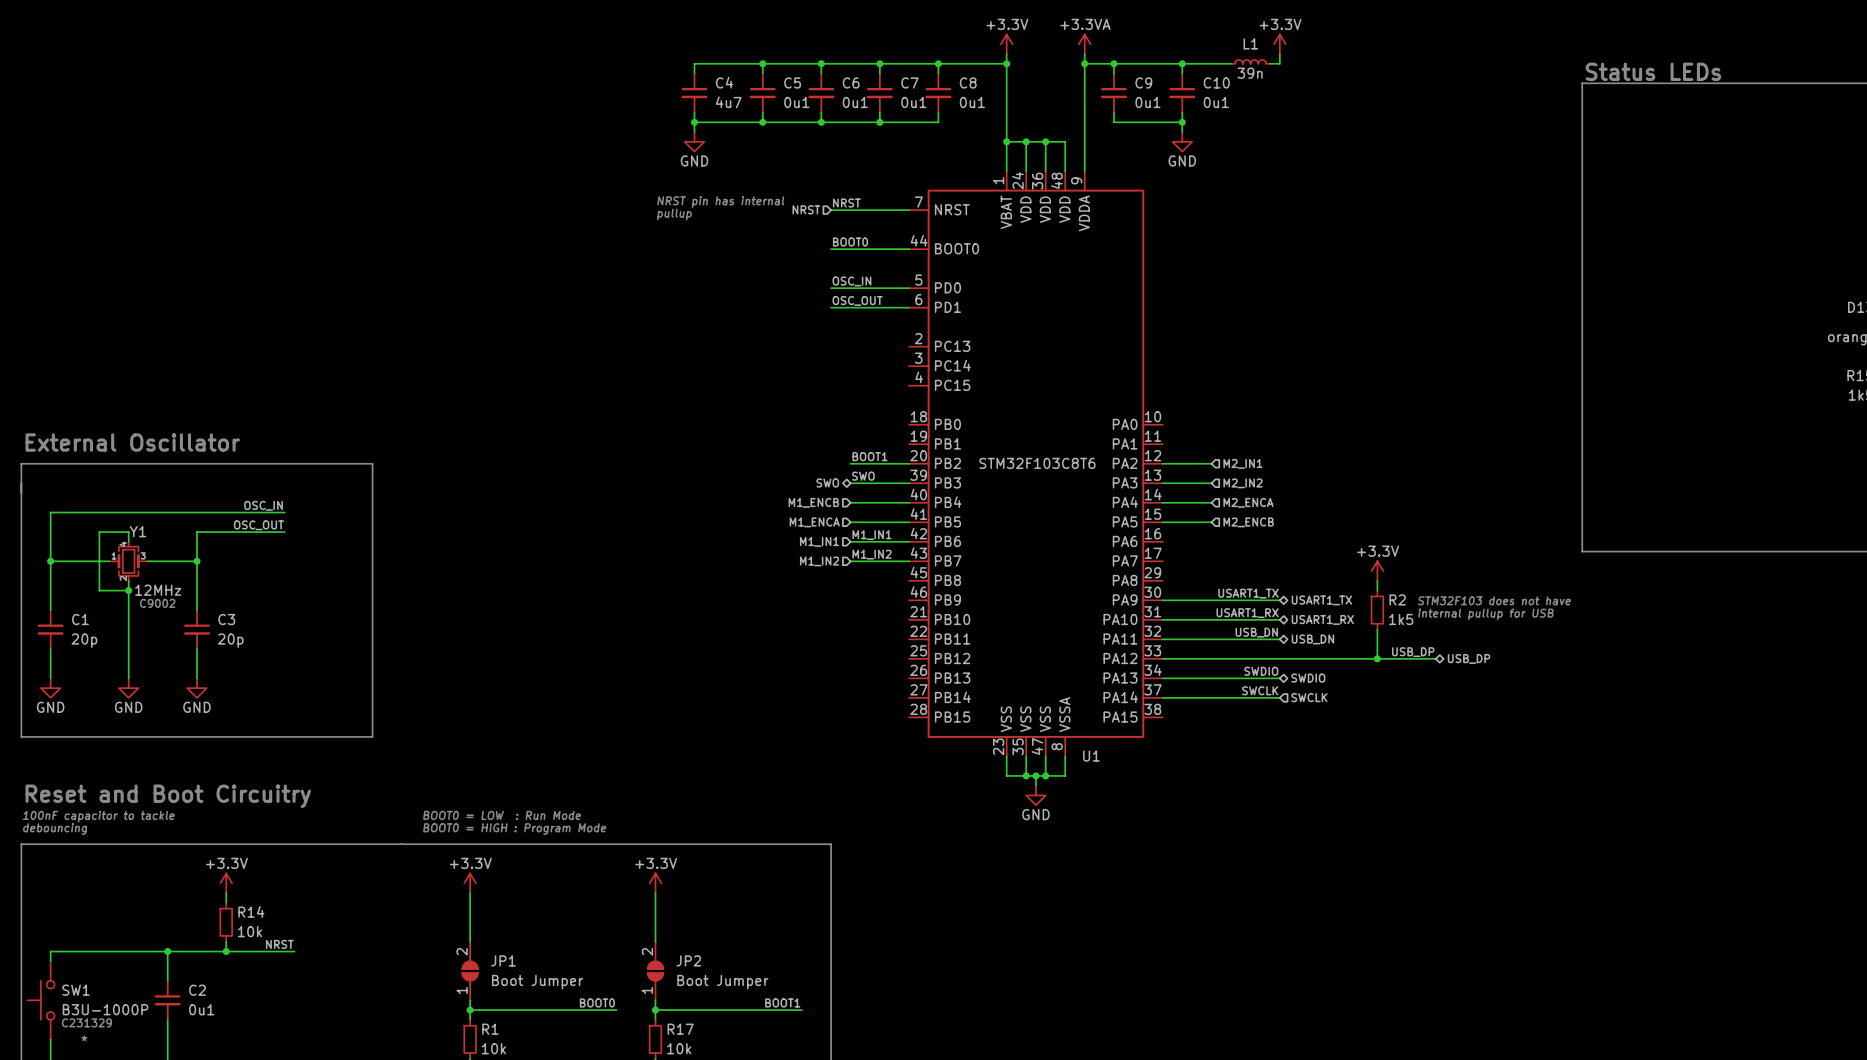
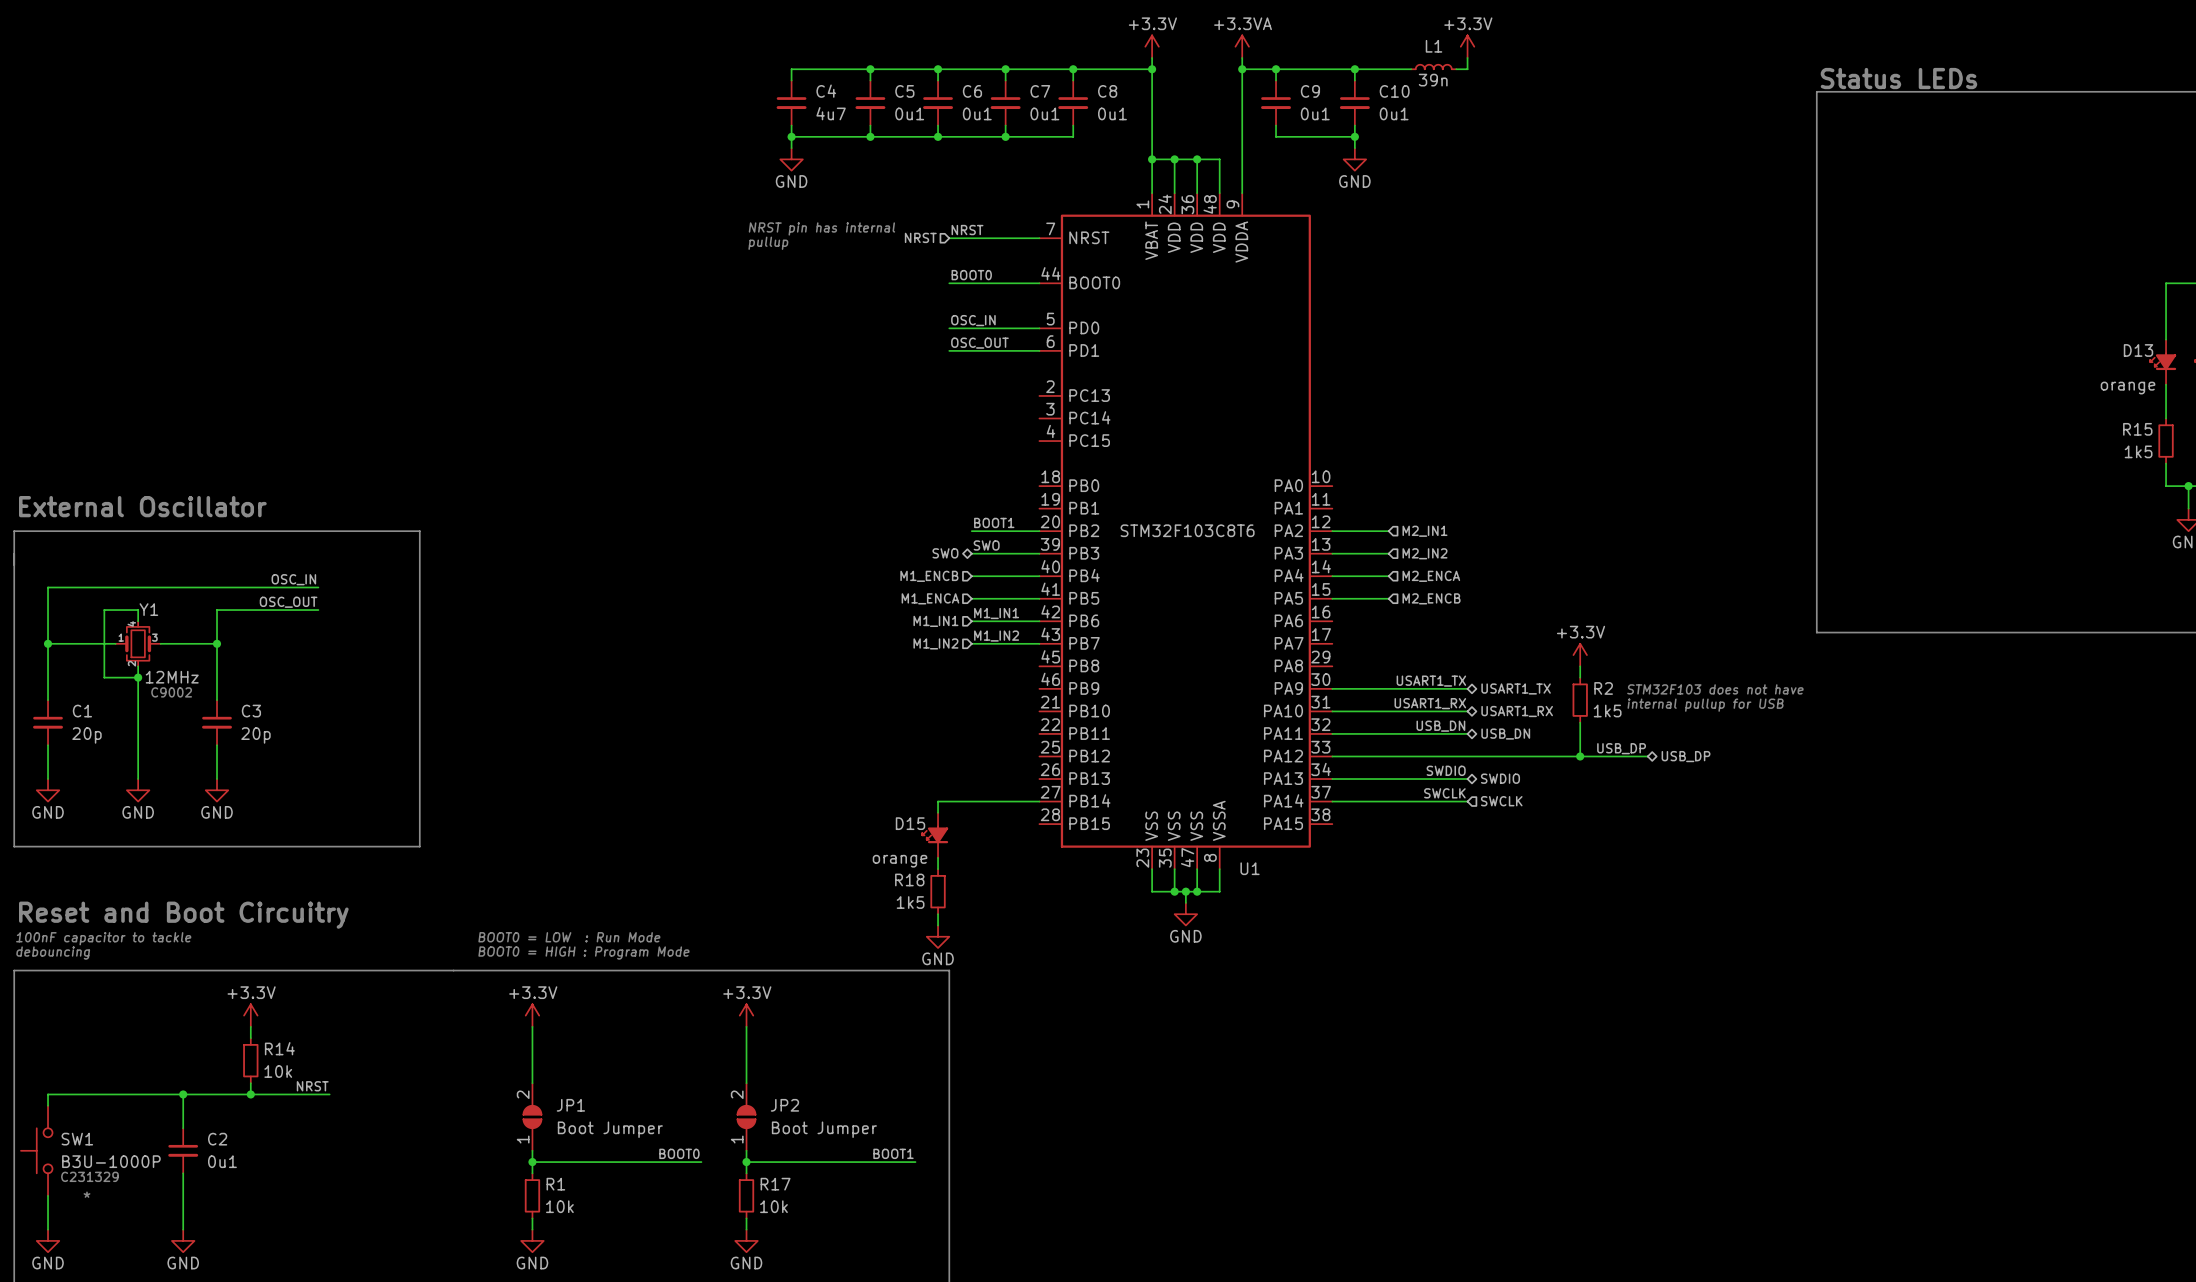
wire: none -> (1039, 801) (938, 801) (938, 812)
D15: none -> orange (935, 835)
wire: none -> (938, 857) (938, 869)
R18: none -> 1k5 (938, 891)
wire: none -> (938, 914) (938, 925)
power symbol: none -> GND (938, 936)

